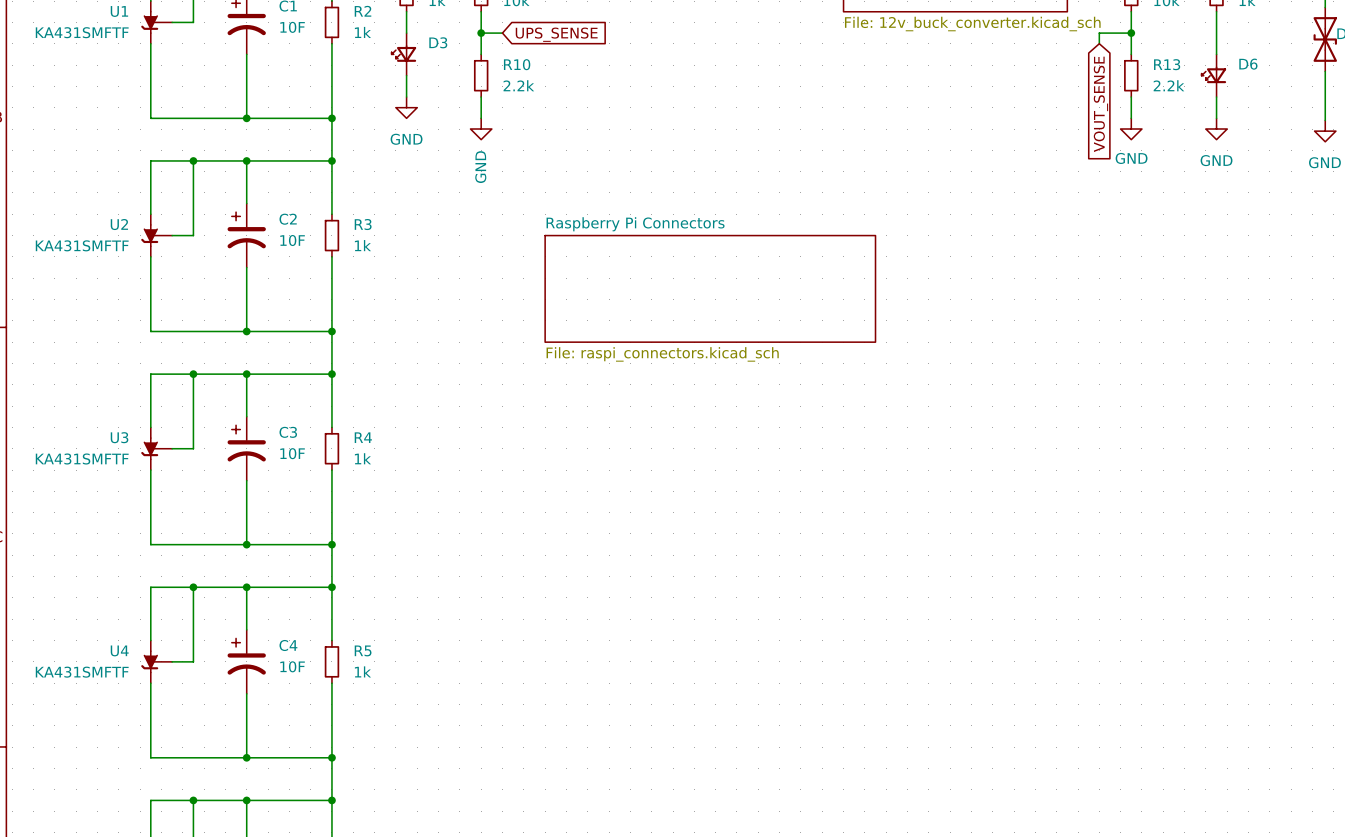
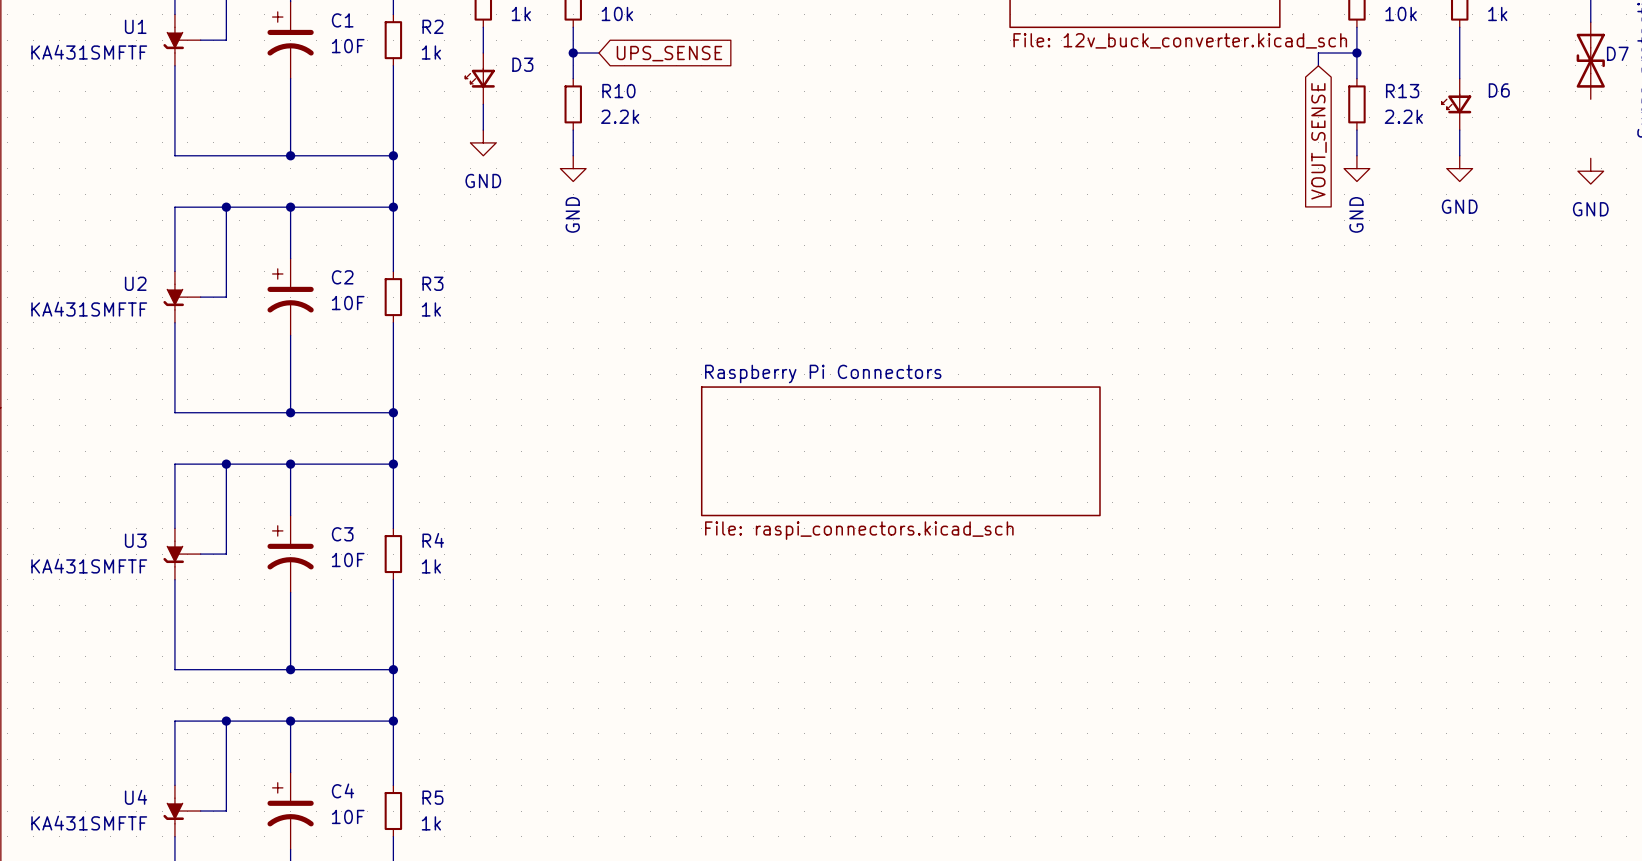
wire: (1325, 71) (1325, 120) -> none
power symbol text rotation: 0° (1131, 158) -> 90° counterclockwise (1356, 214)
sheet Raspberry Pi Connectors position: (710, 288) -> (900, 451)

